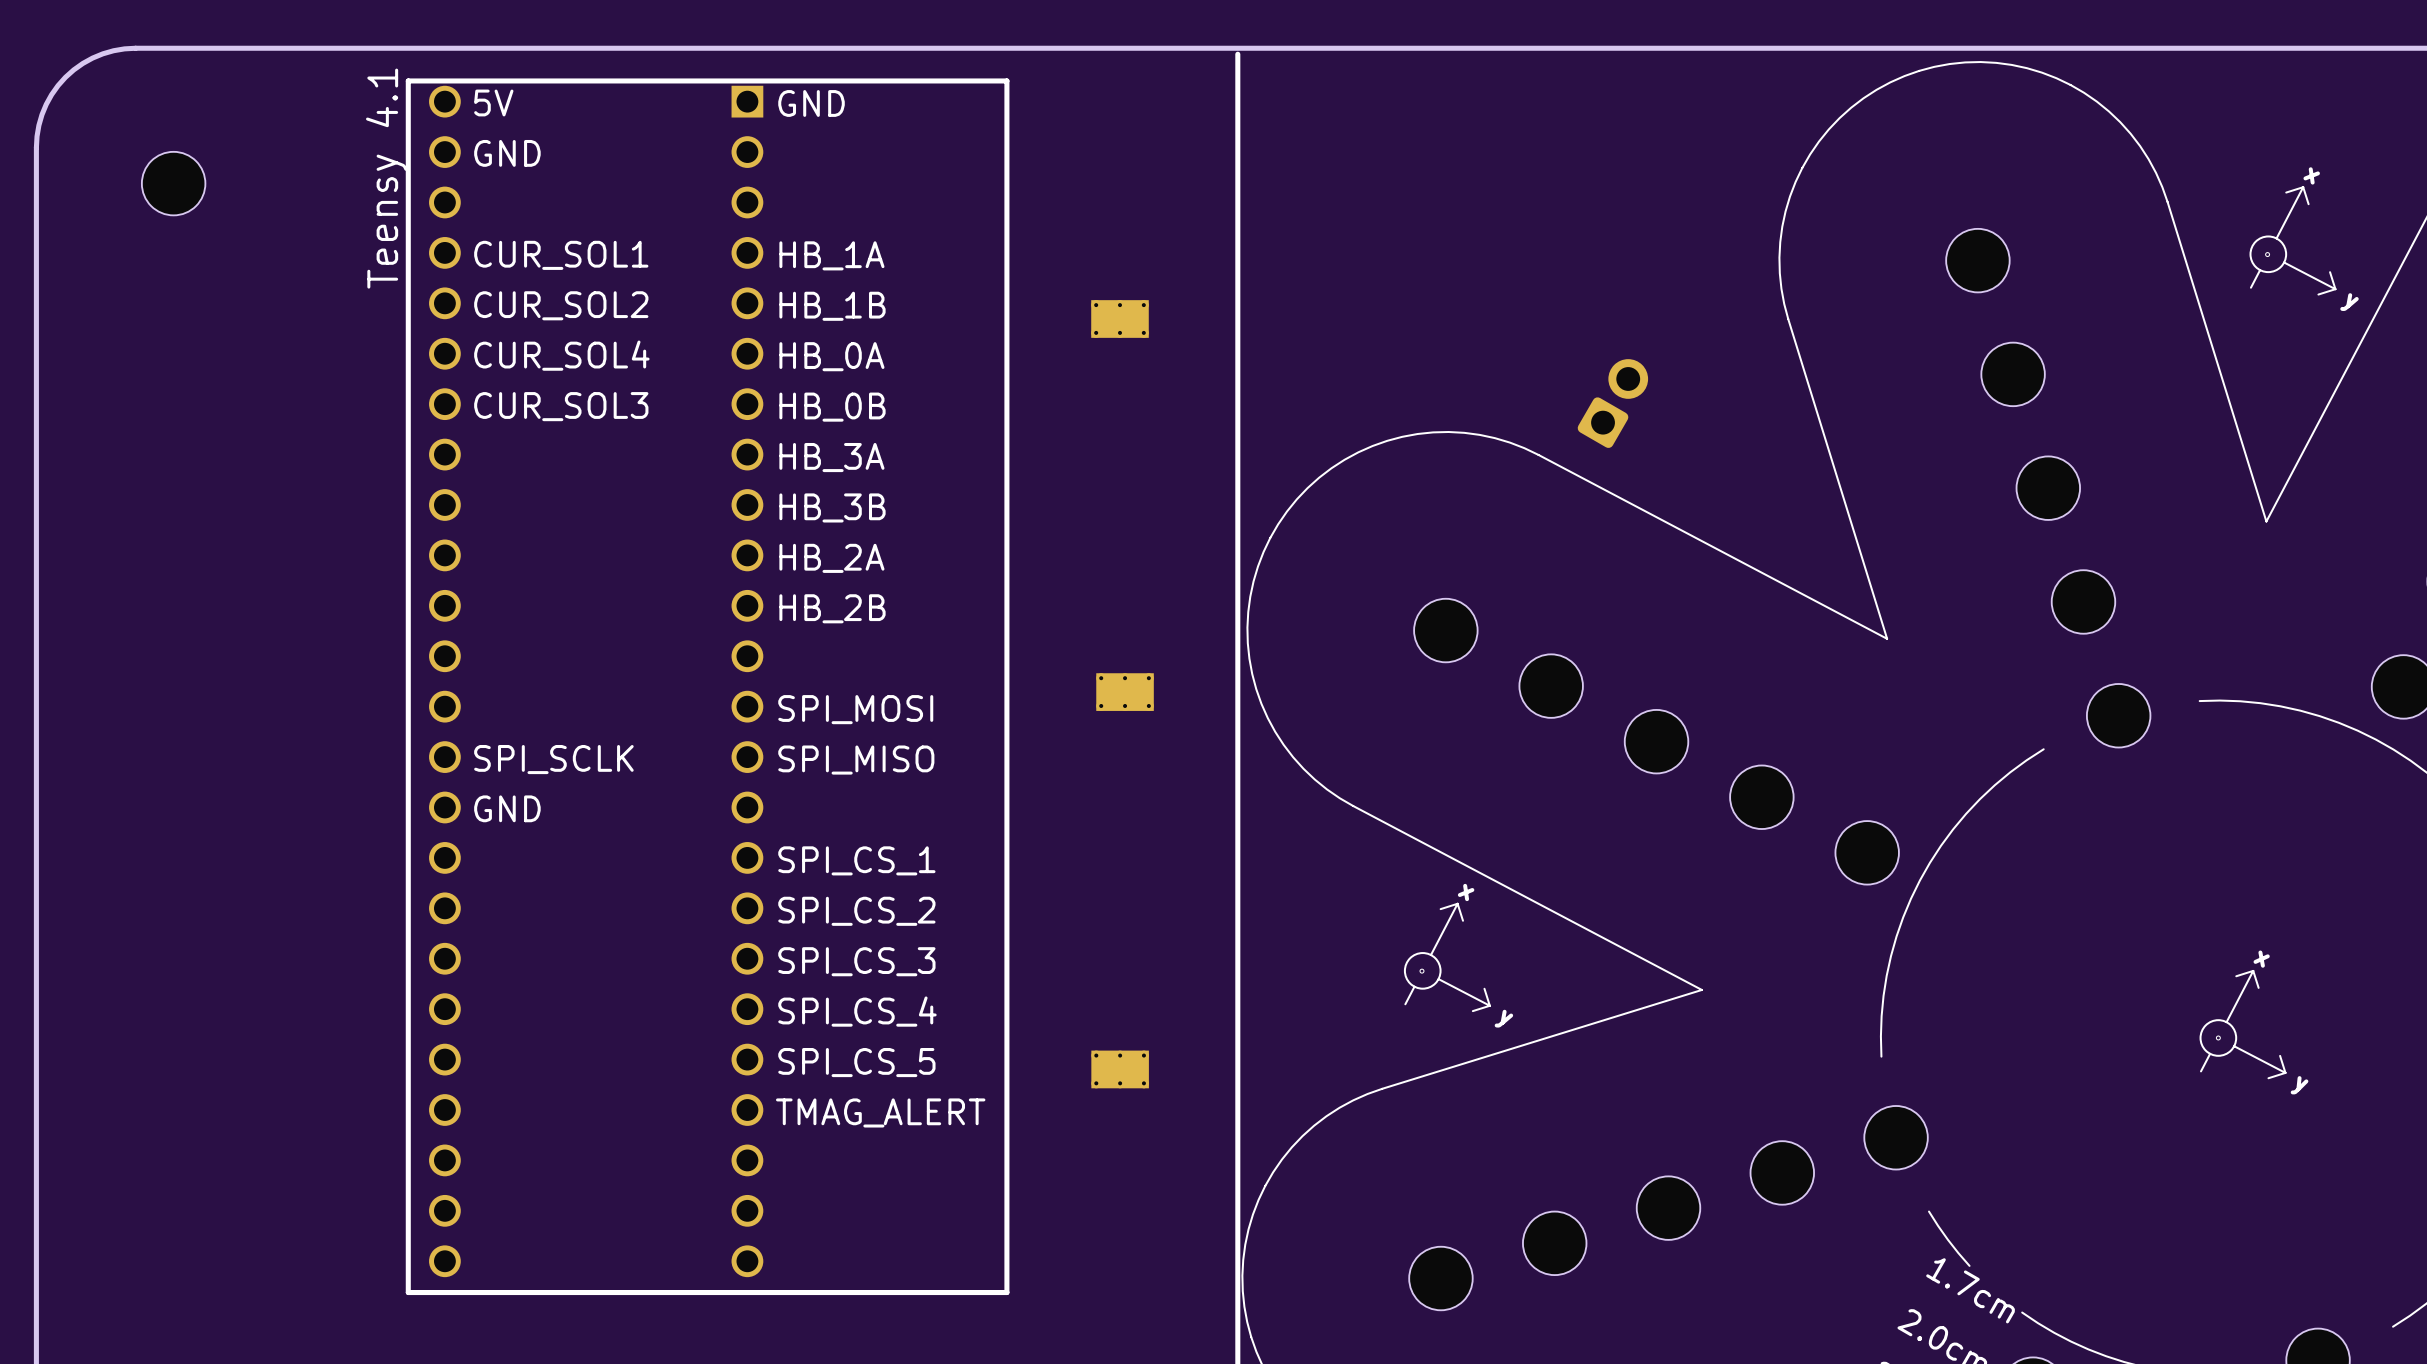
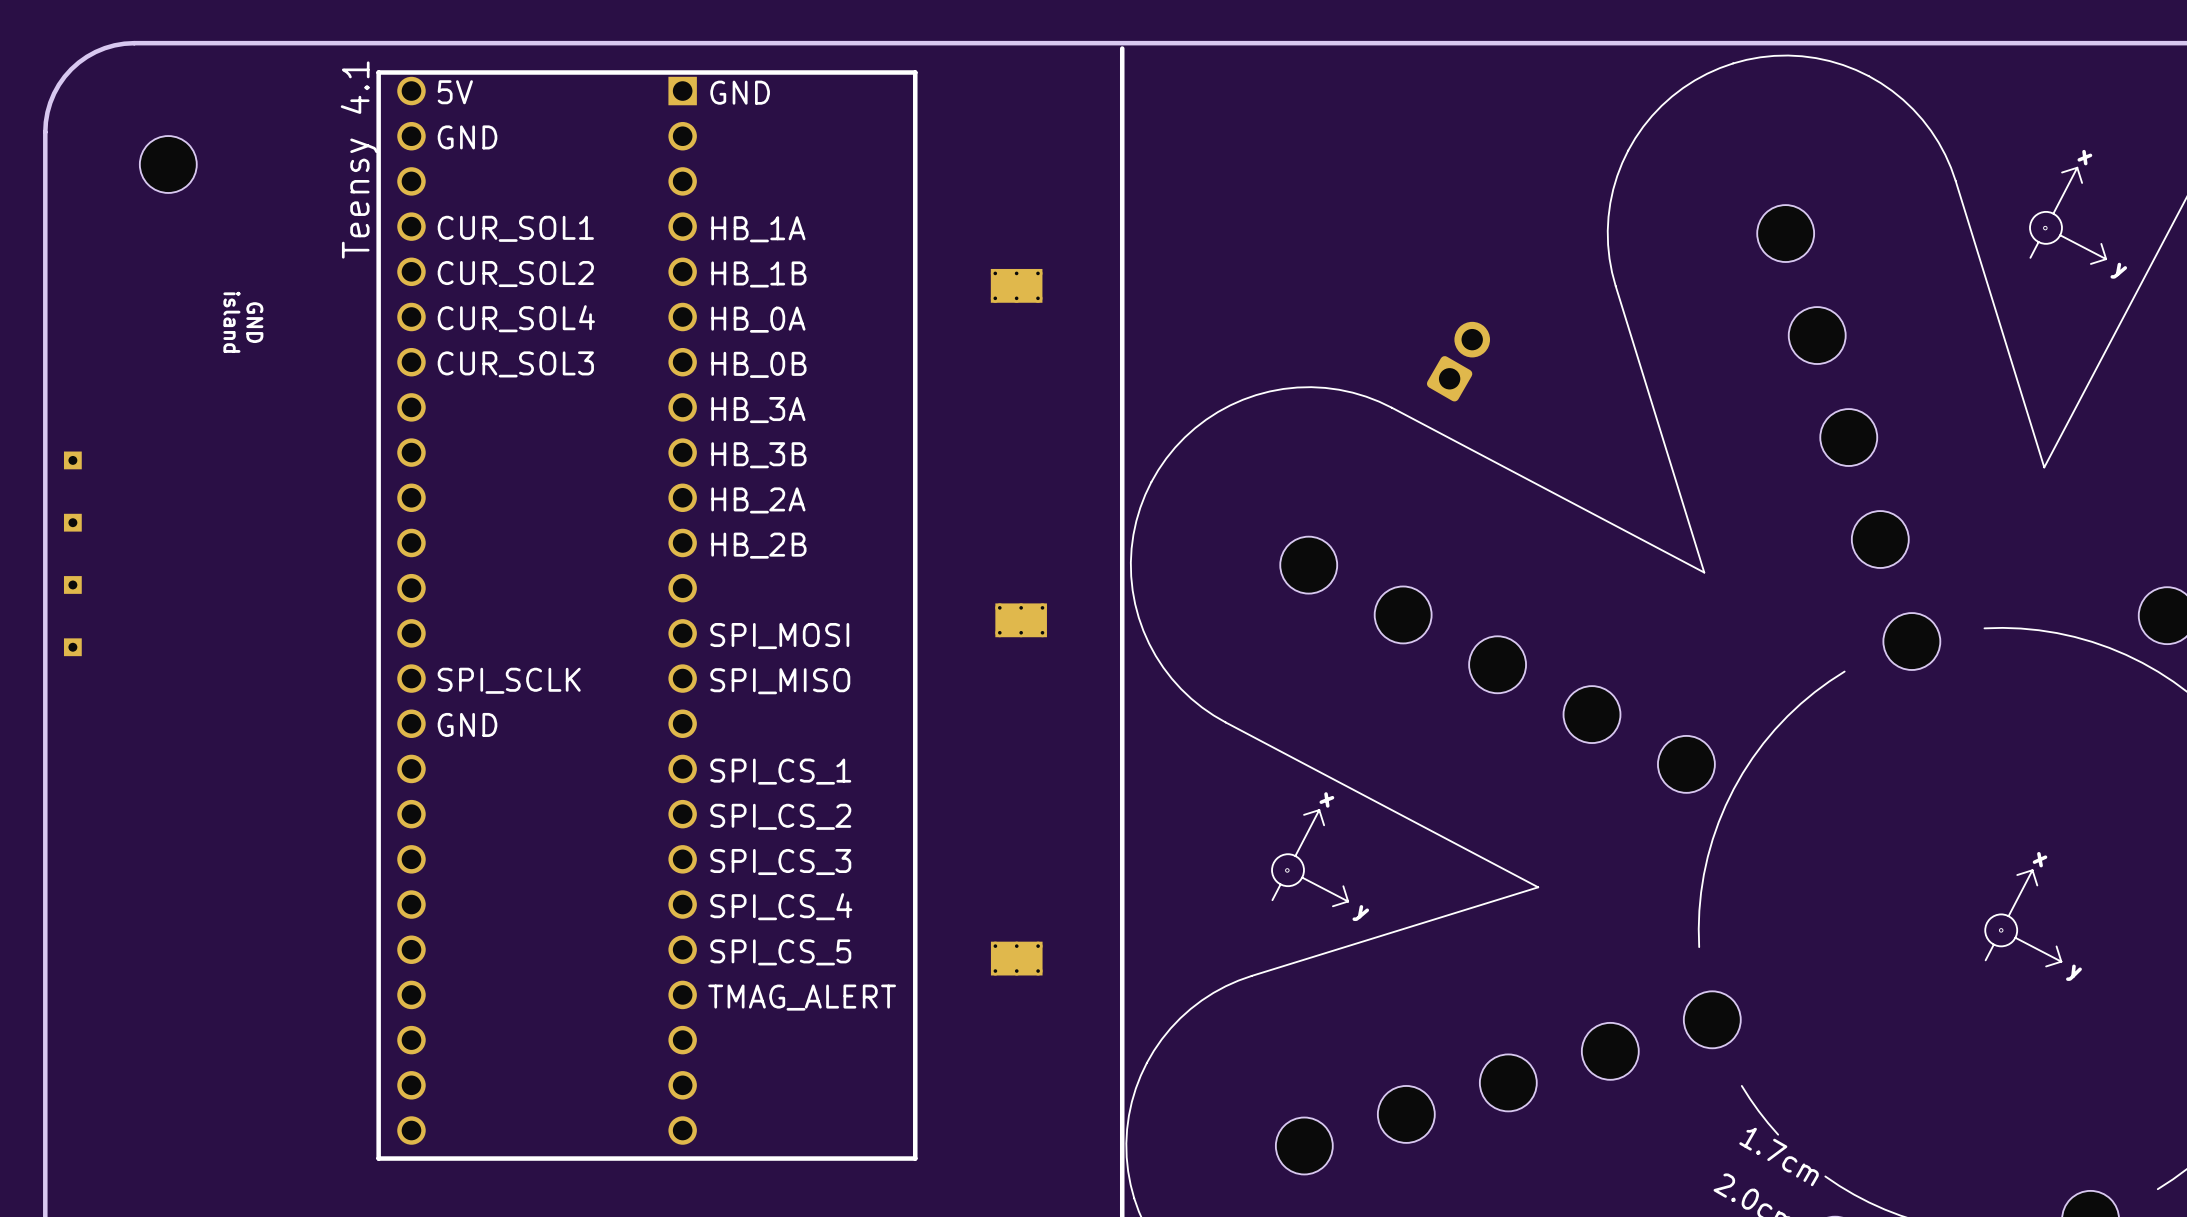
text: none -> island (231, 322)
text: none -> GND (254, 322)
part: none -> (72, 460)
part: none -> (72, 522)
part: none -> (72, 584)
part: none -> (72, 647)

